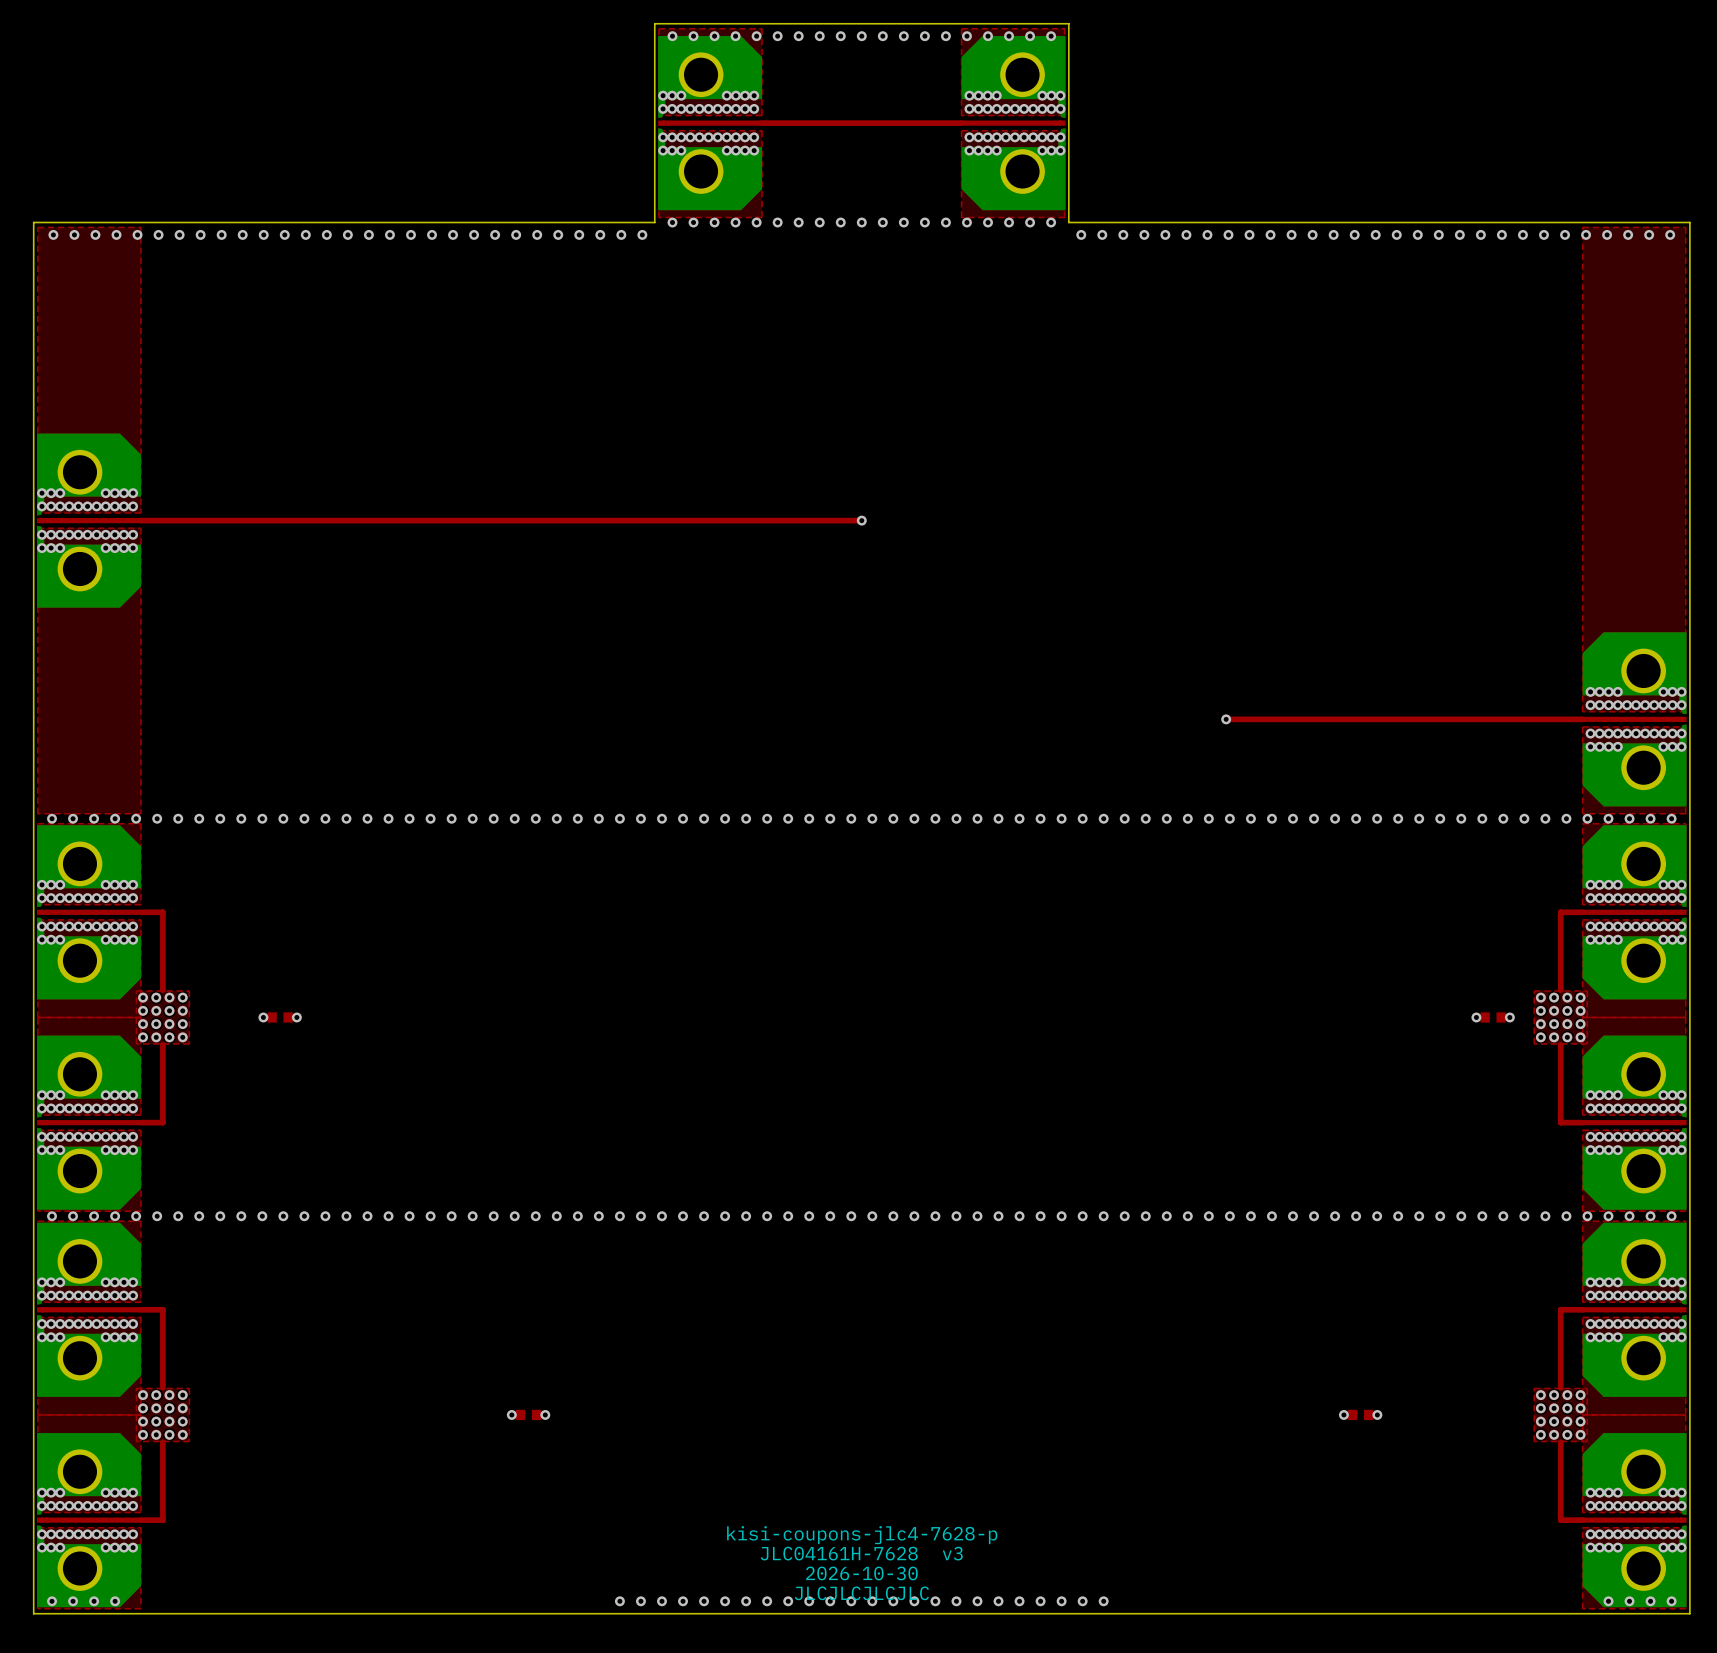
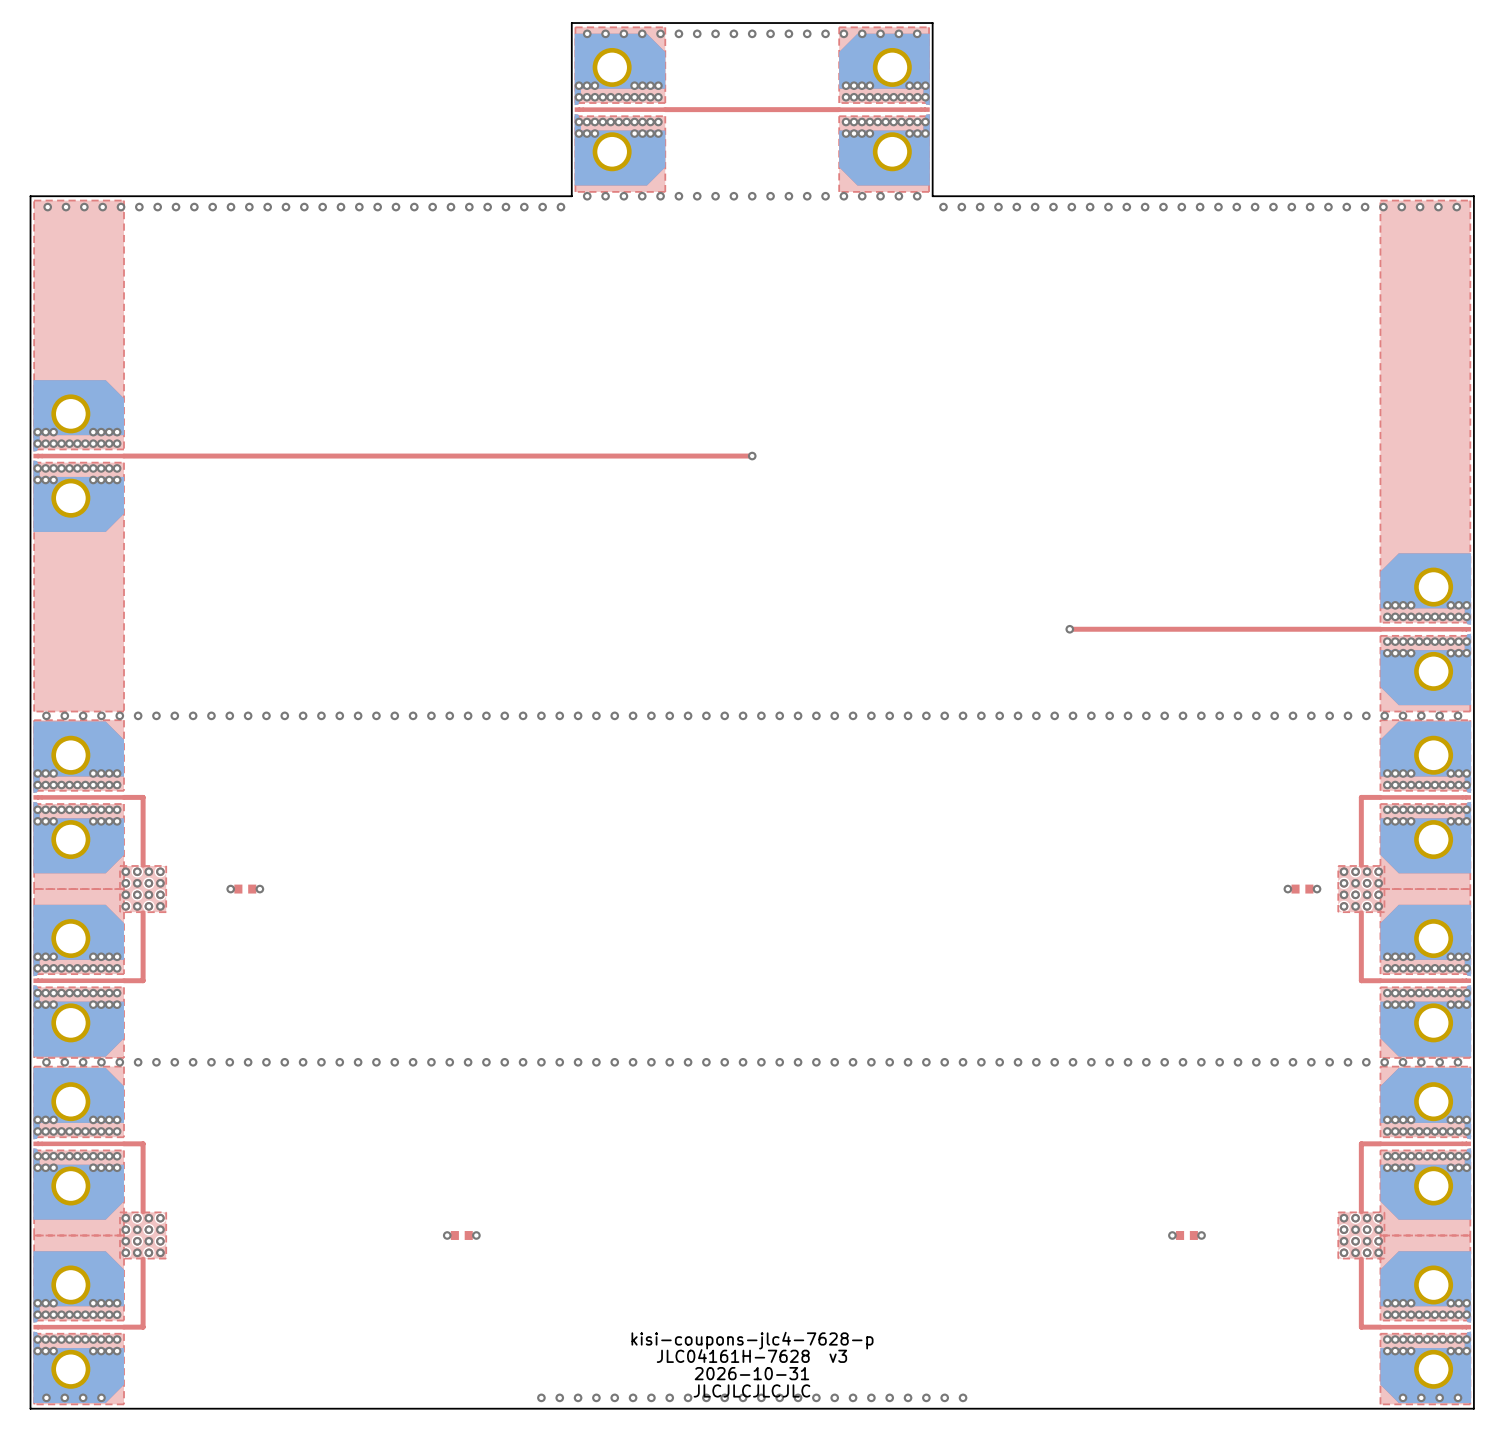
text: 2026-10-30 (861, 1573) -> 2026-10-31 (751, 1373)

